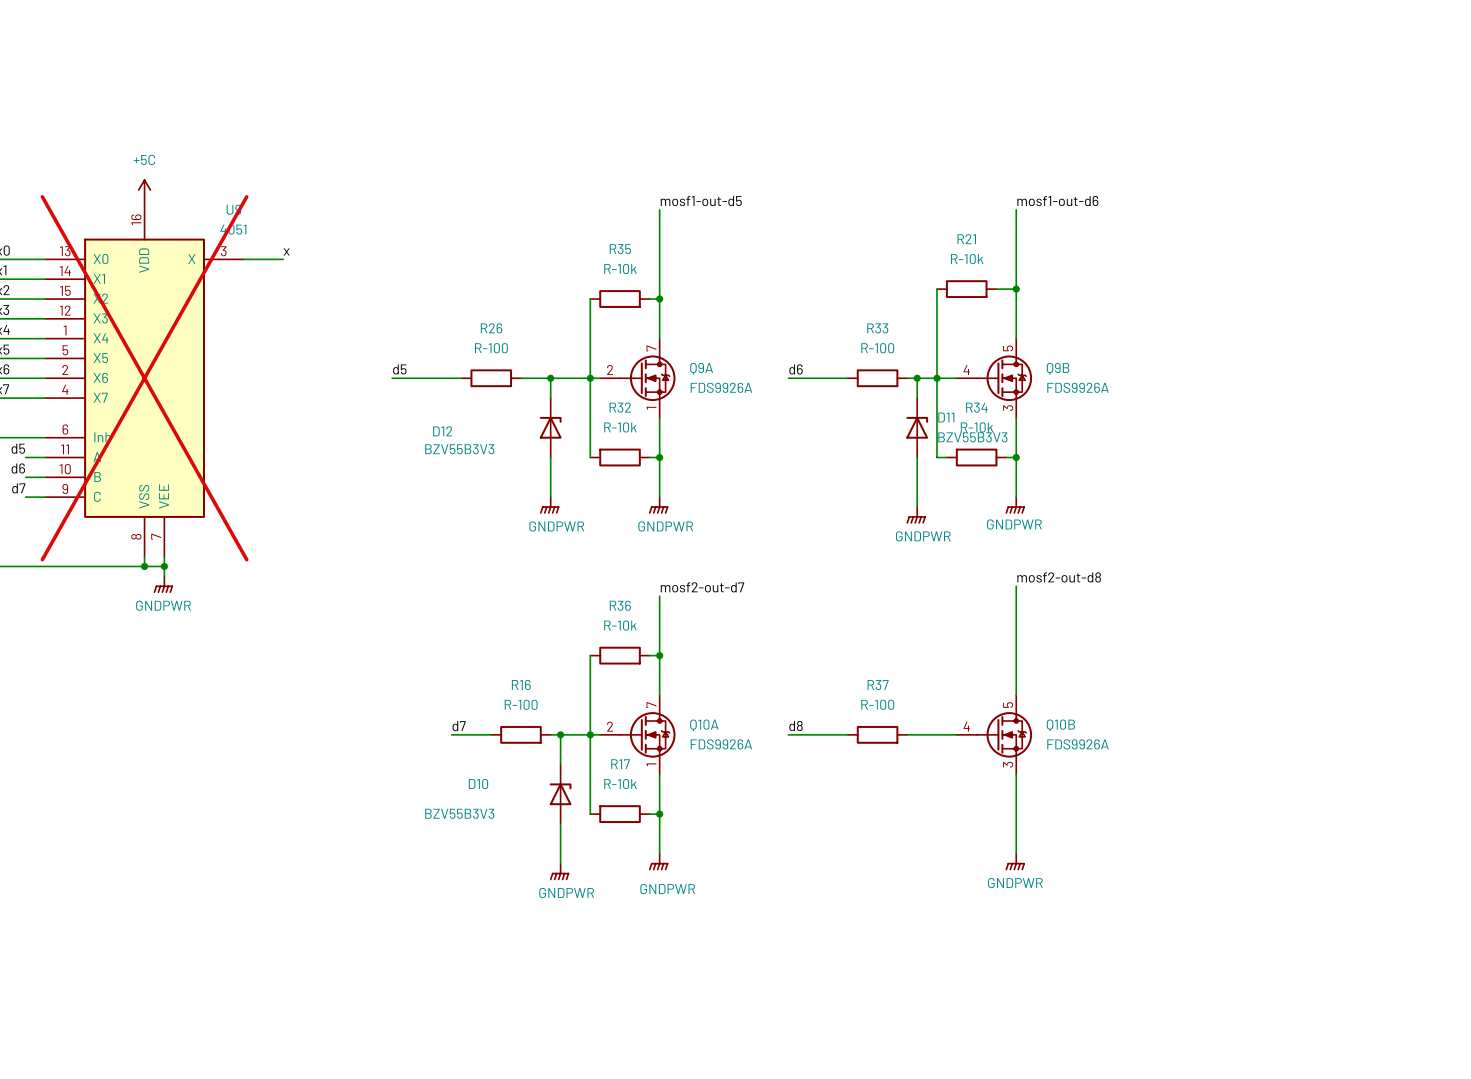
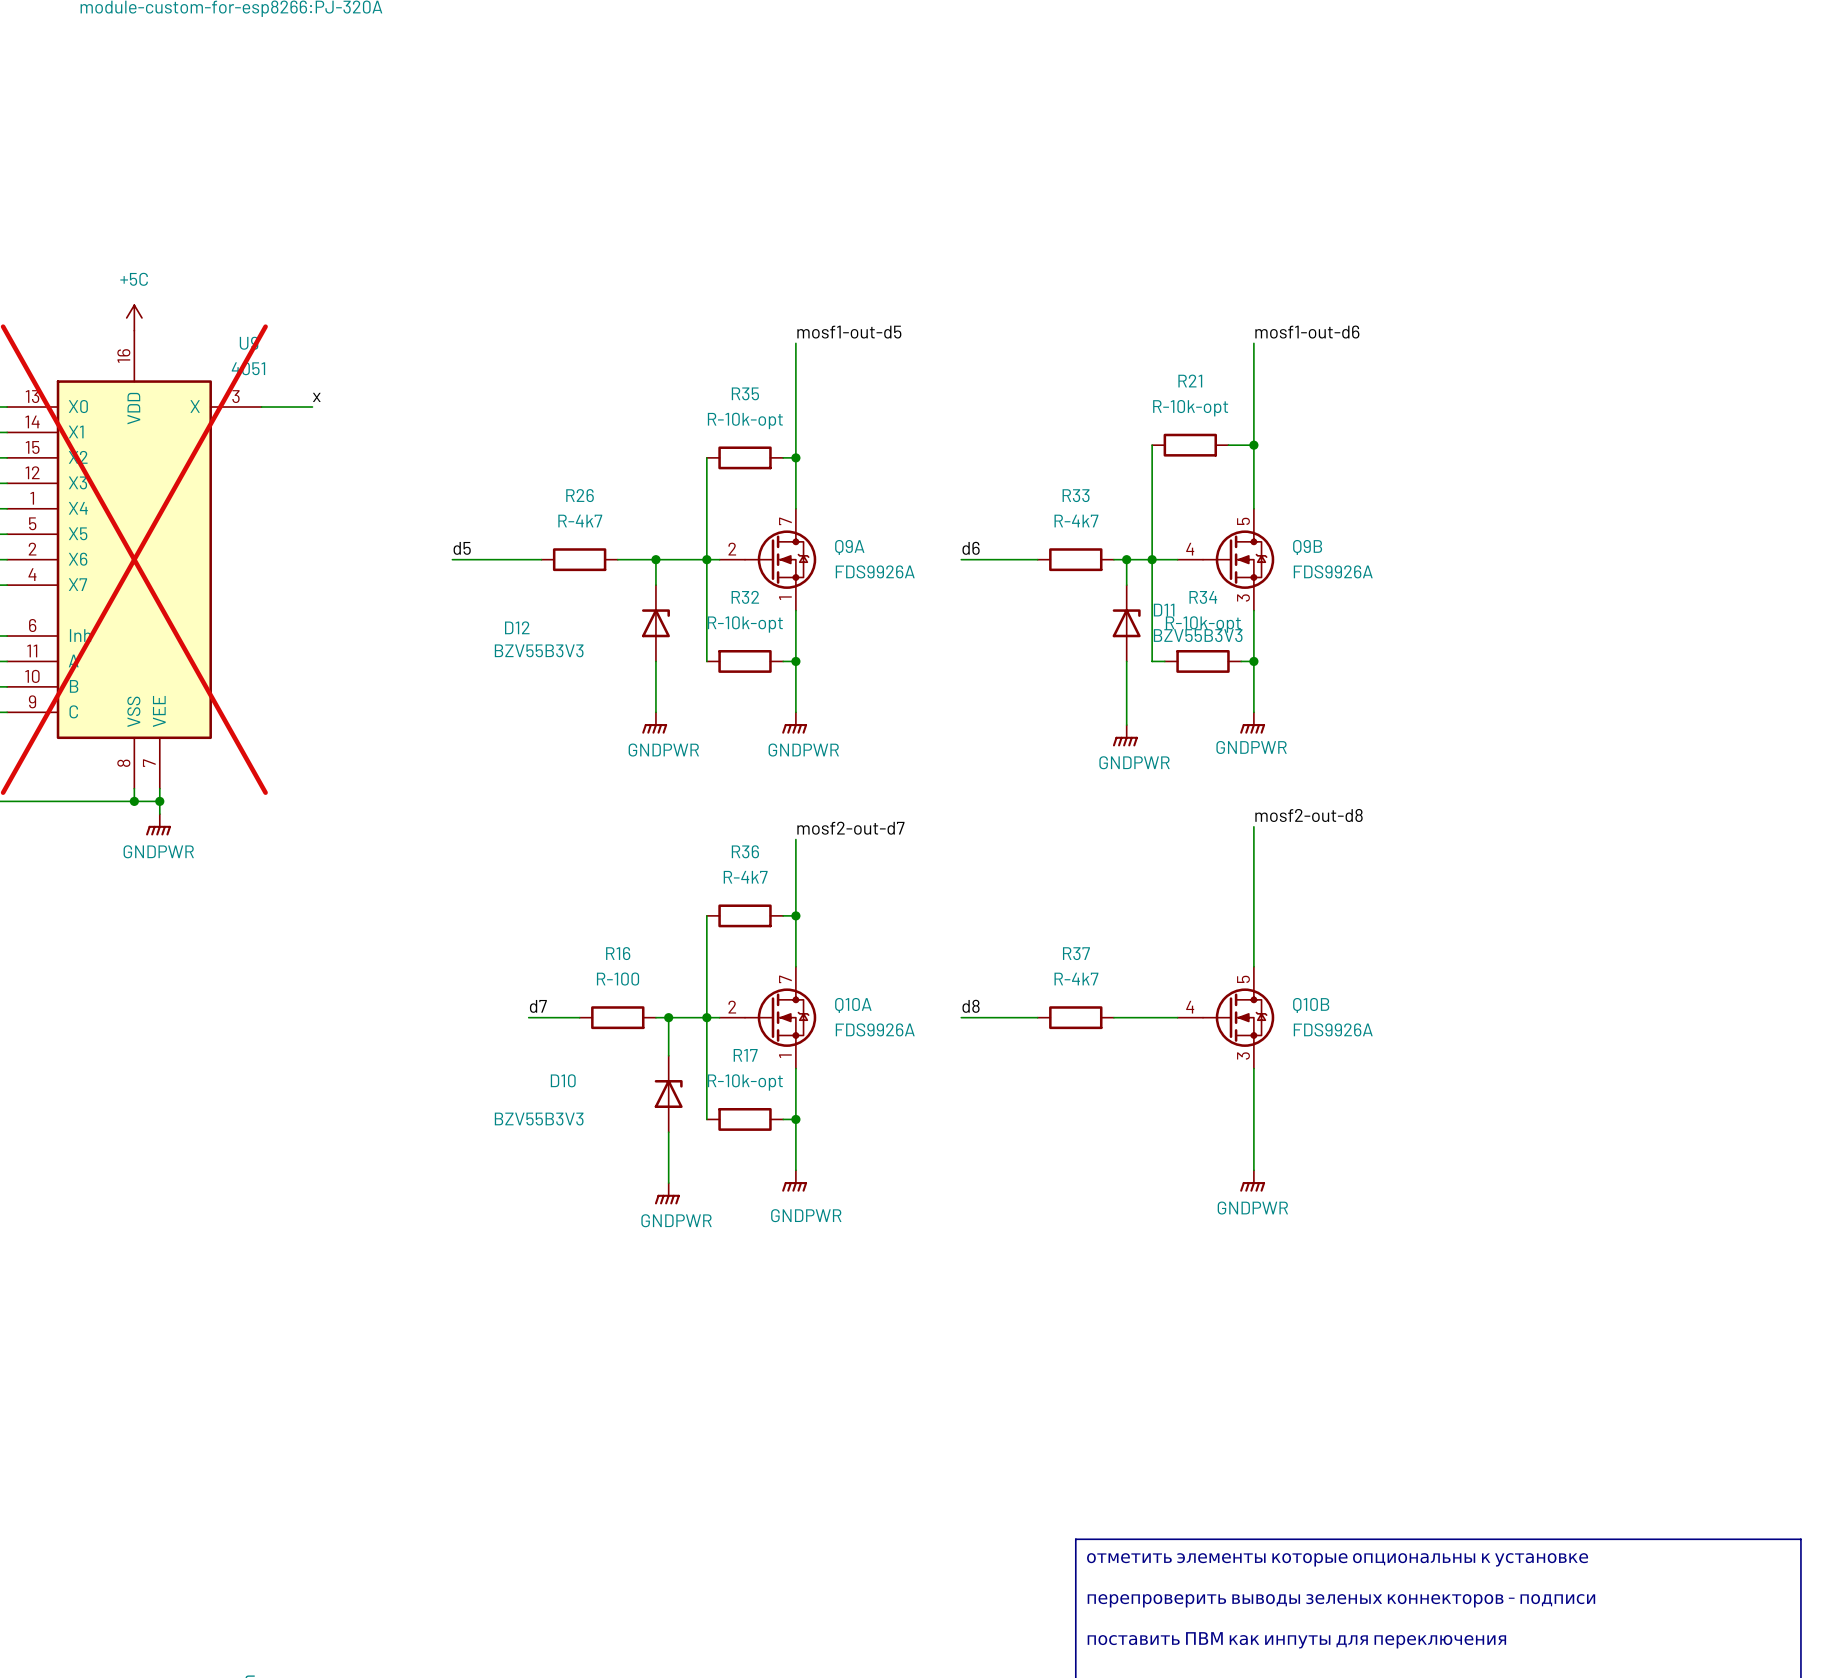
R21 value: R-10k (967, 259) -> R-10k-opt (1190, 408)
R35 value: R-10k (620, 268) -> R-10k-opt (745, 420)
R26 value: R-100 (491, 348) -> R-4k7 (580, 521)
R33 value: R-100 (877, 348) -> R-4k7 (1076, 521)
R32 value: R-10k (620, 427) -> R-10k-opt (745, 624)
R34 value: R-10k (977, 427) -> R-10k-opt (1203, 624)
R36 value: R-10k (620, 625) -> R-4k7 (745, 877)
R37 value: R-100 (877, 704) -> R-4k7 (1076, 979)
R17 value: R-10k (620, 784) -> R-10k-opt (745, 1082)

